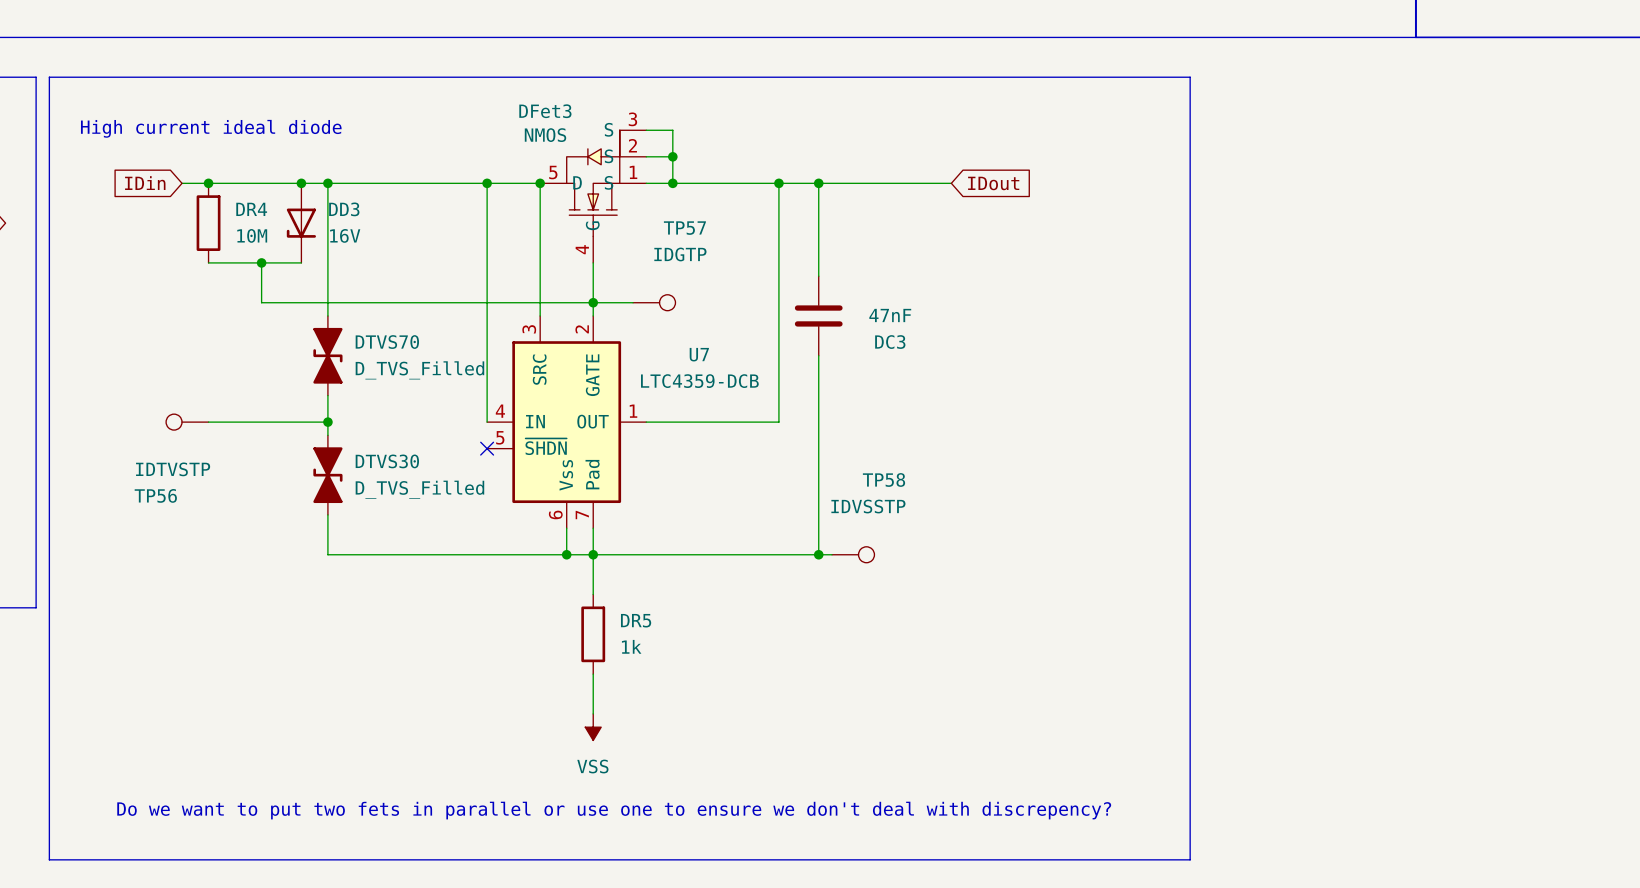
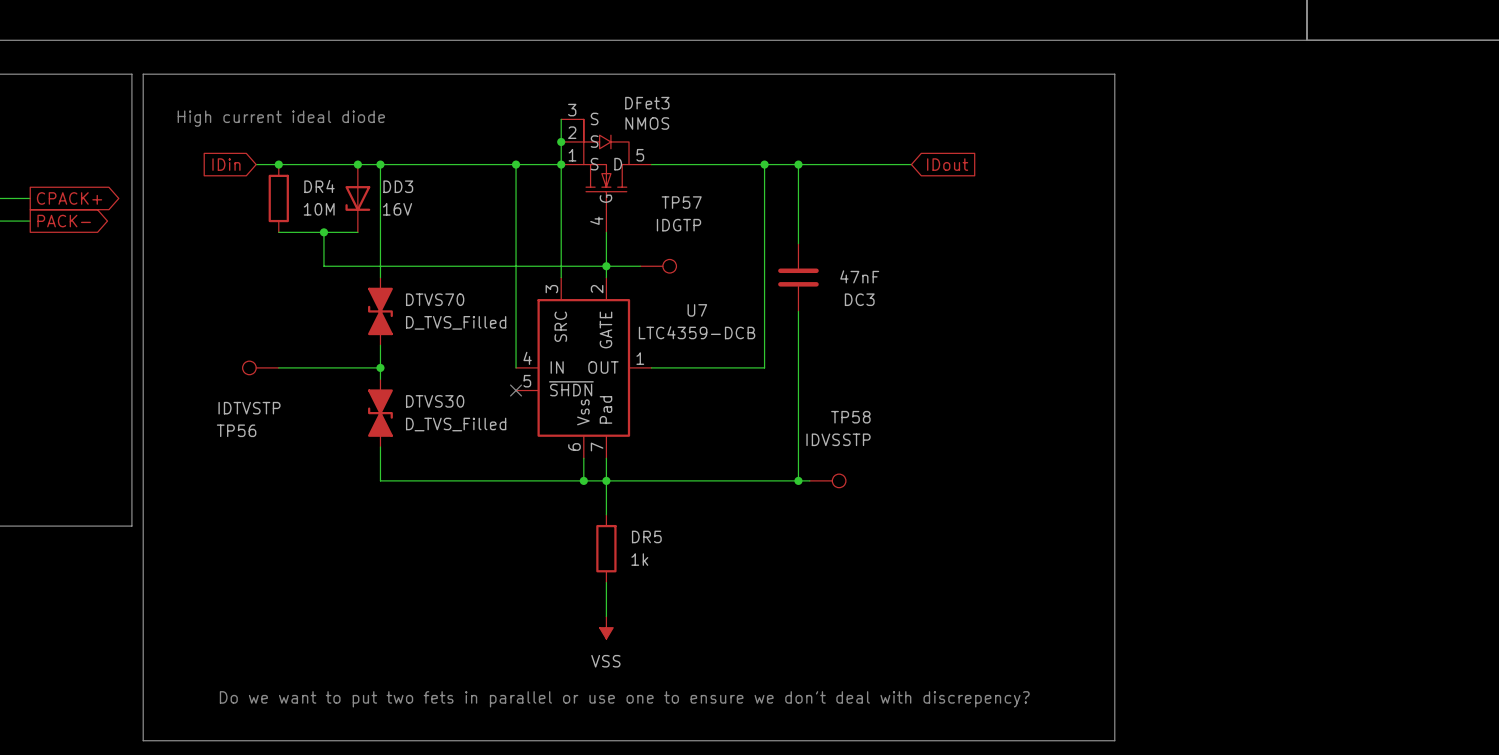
wire: none -> (561, 119) (561, 164)
wire: (646, 130) (672, 130) (672, 183) -> none
junction: none -> (561, 141)
wire: (646, 156) (672, 156) -> none
junction: (672, 156) -> none
DFet3 flip: as is (593, 183) -> left-right (606, 164)
junction: (672, 183) -> none

